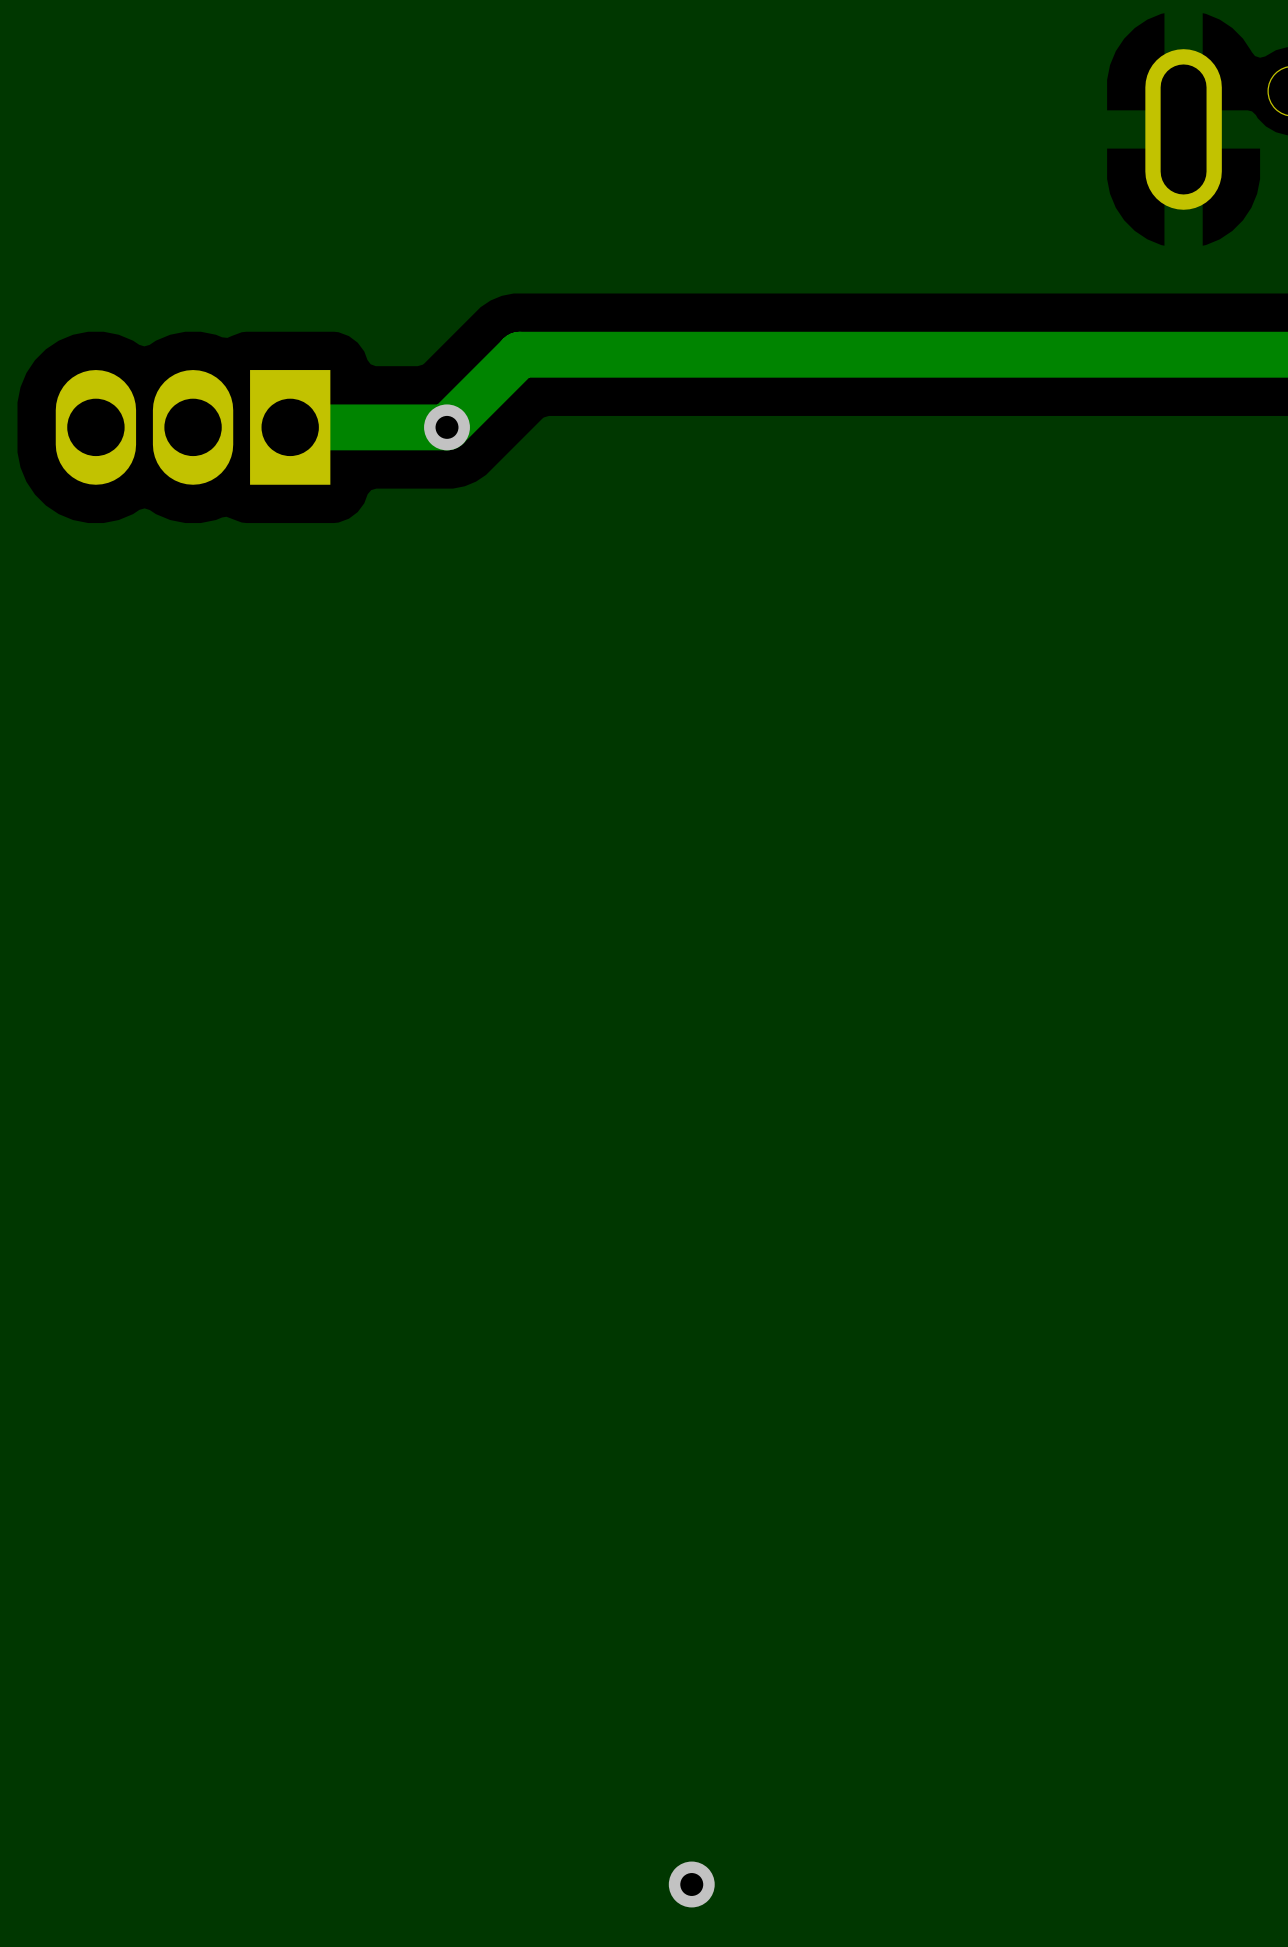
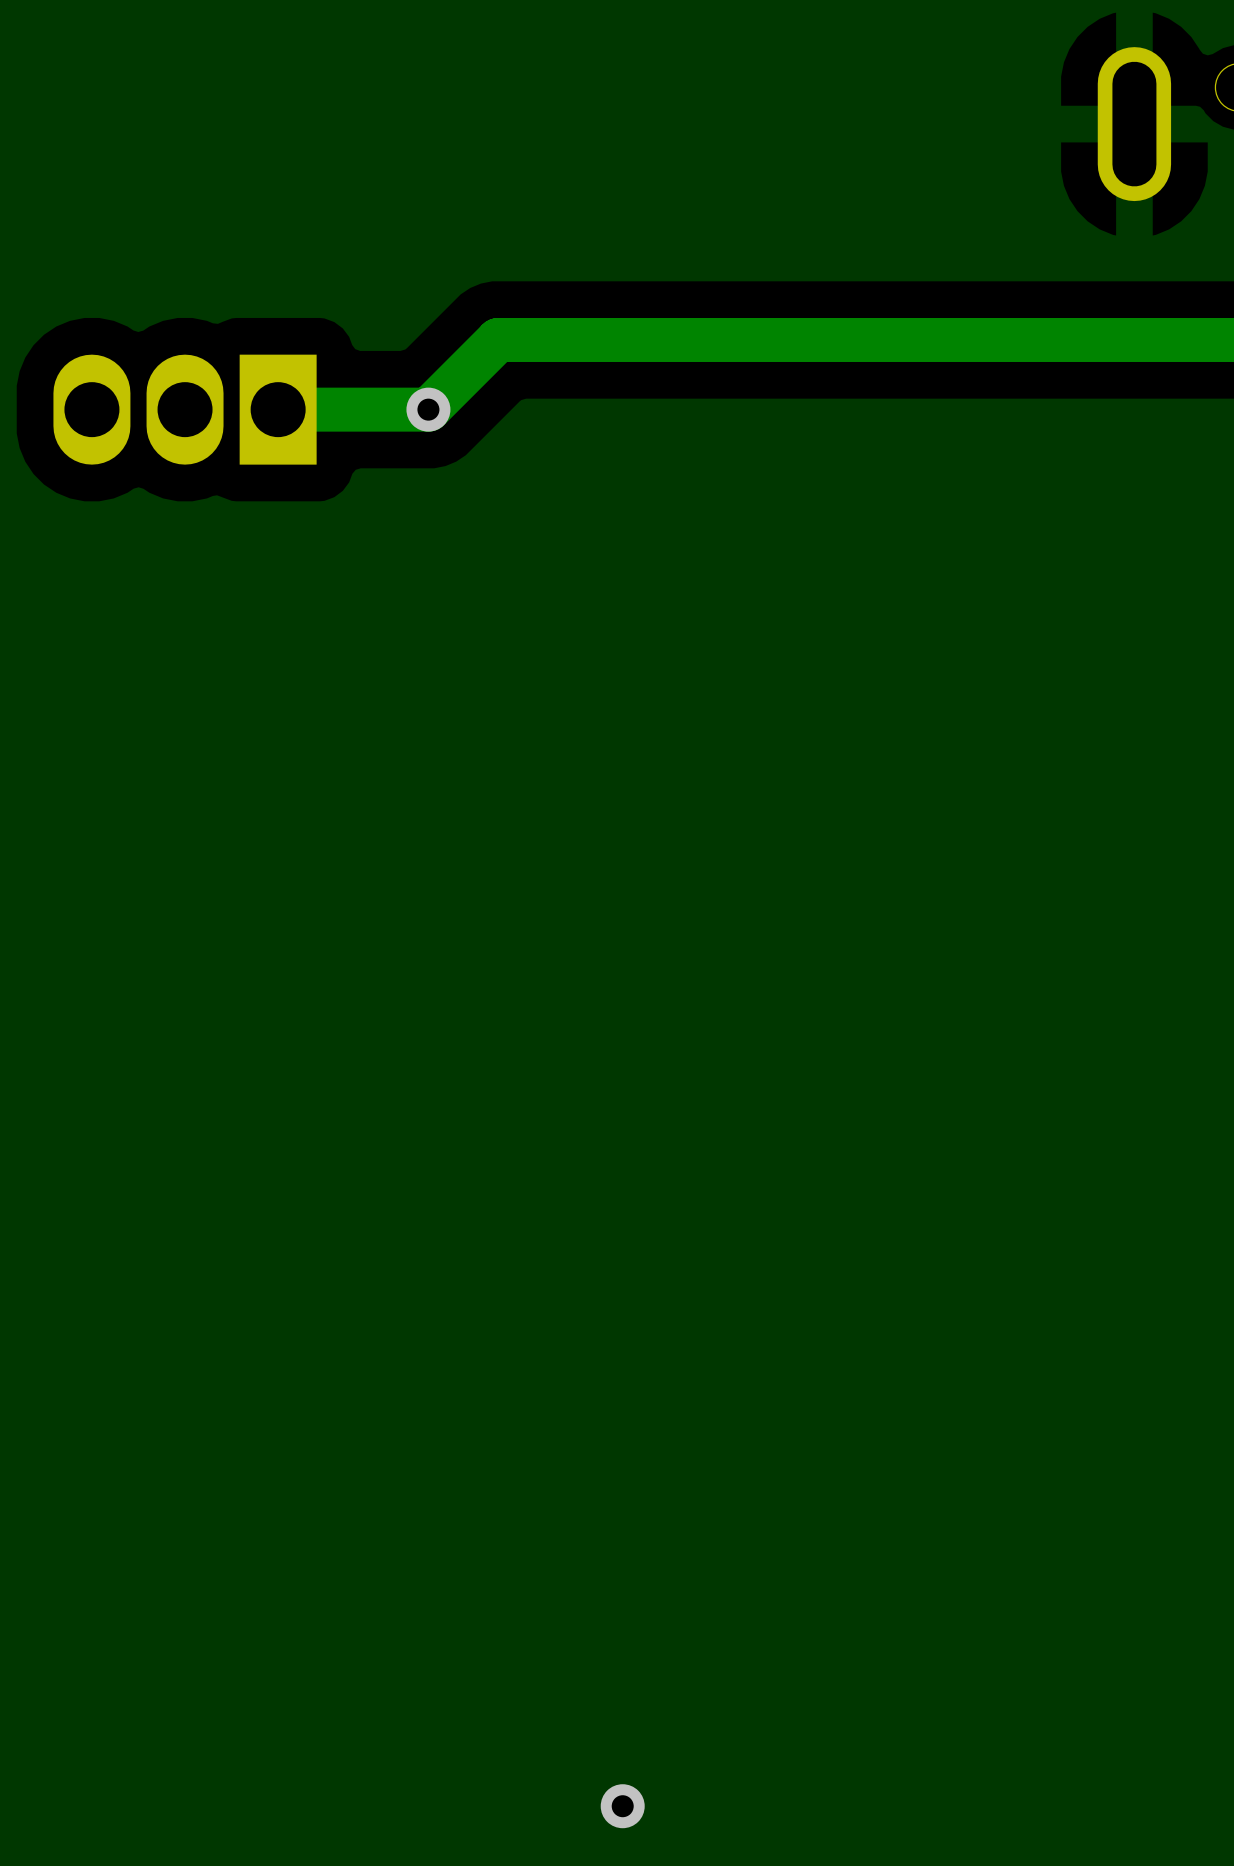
via position: (691, 1884) -> (622, 1806)

